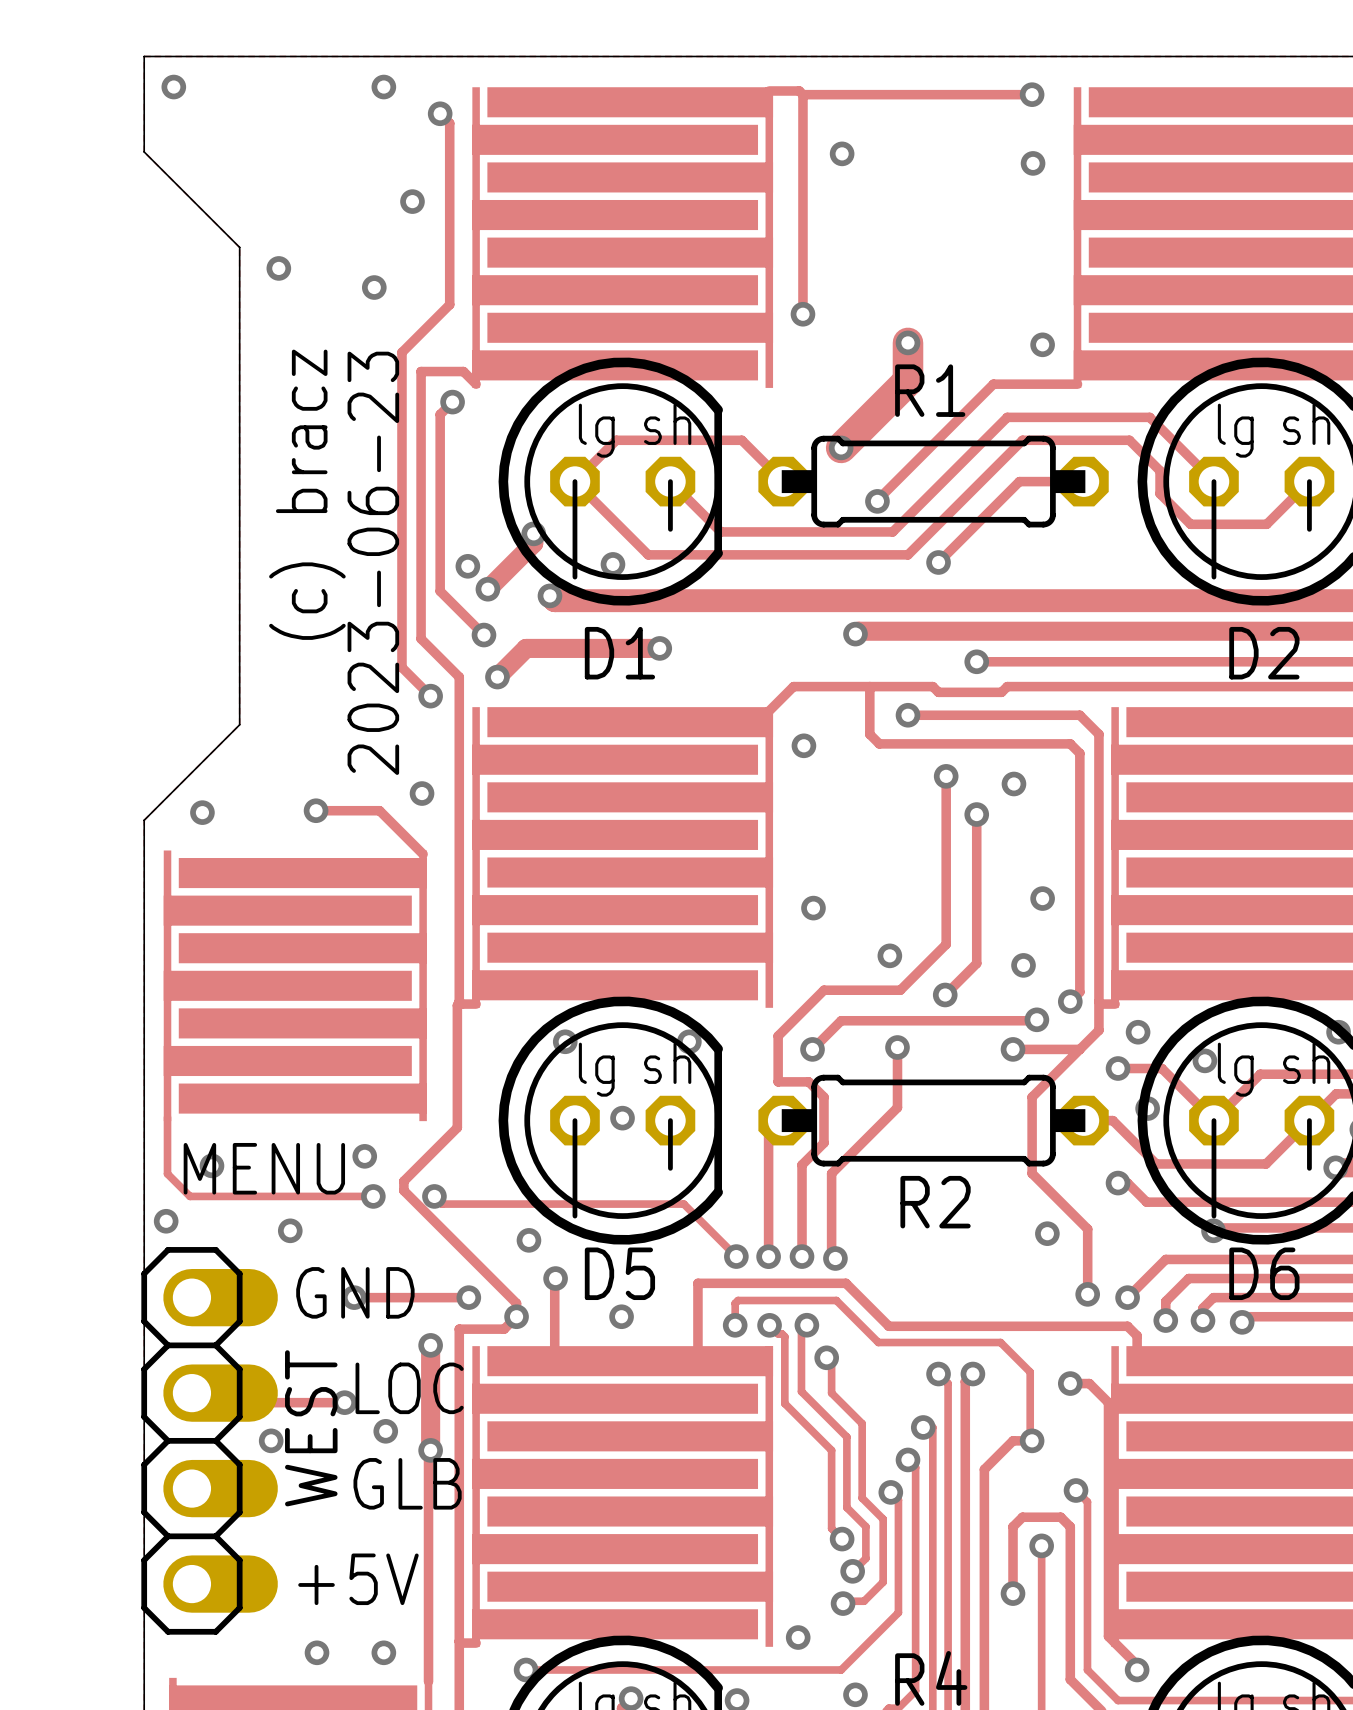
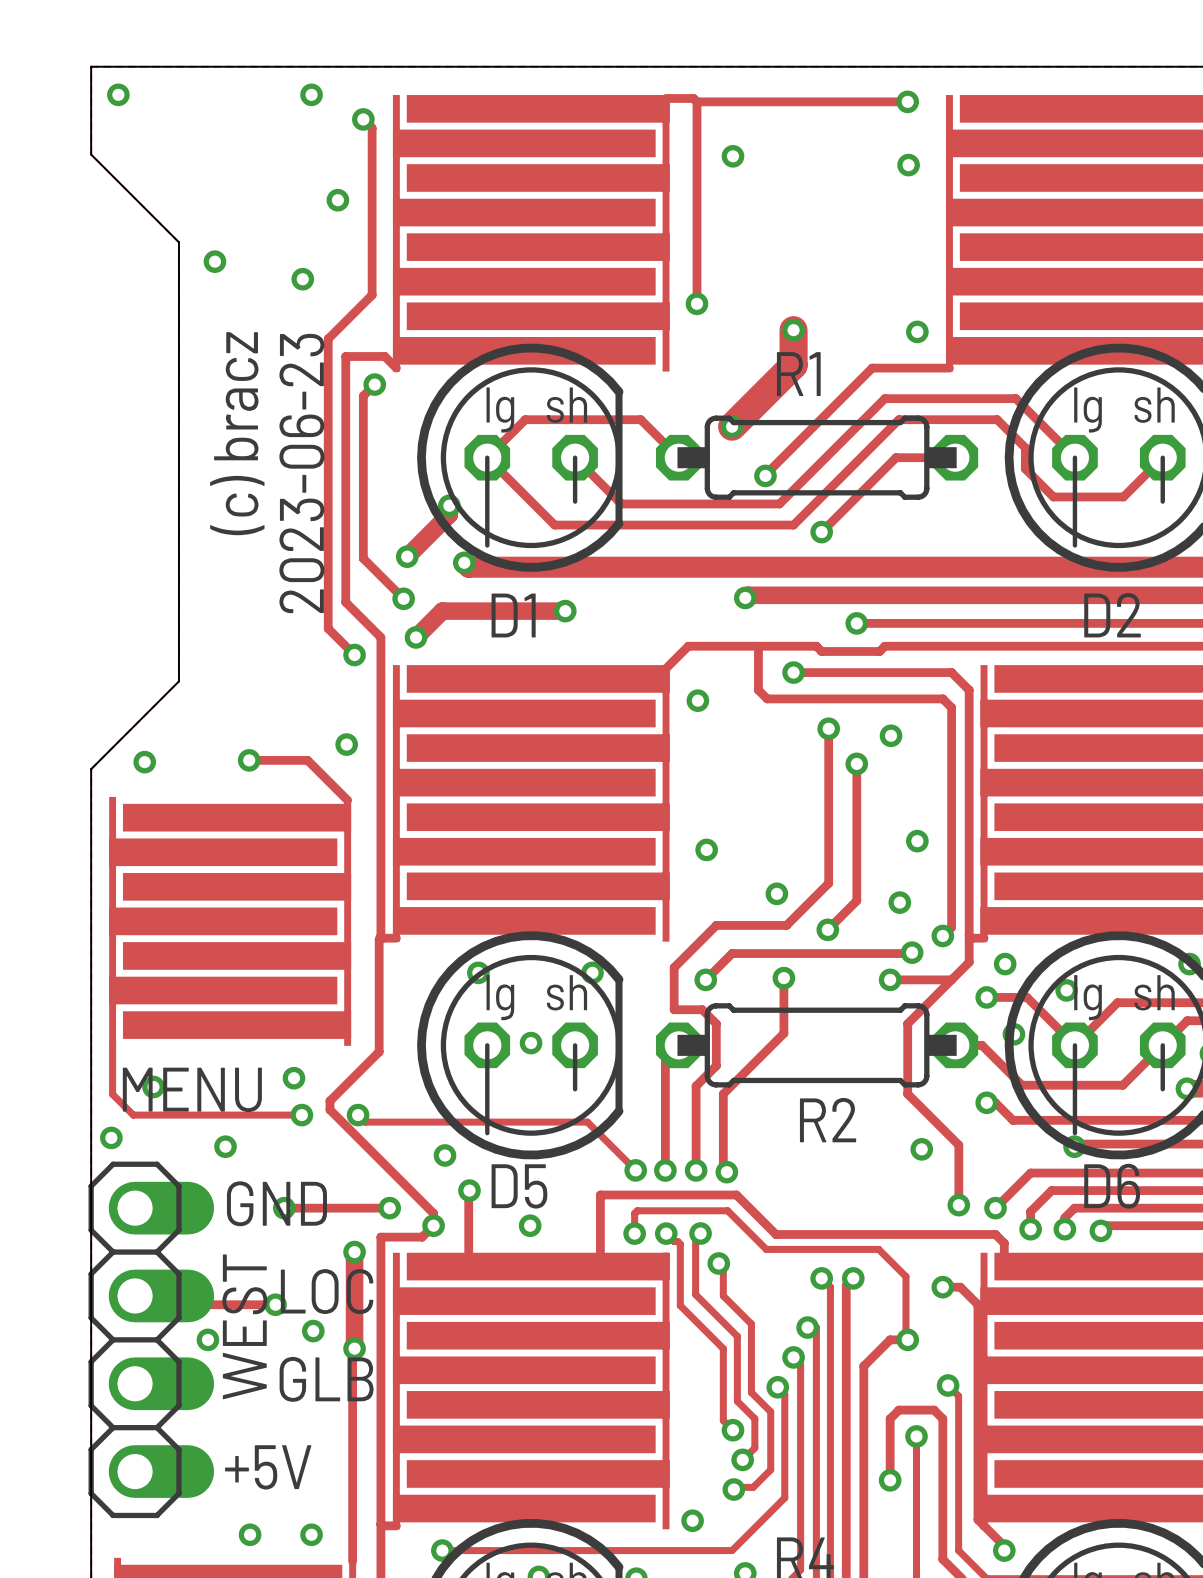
via: (612, 564) -> none
via: (467, 566) -> none

